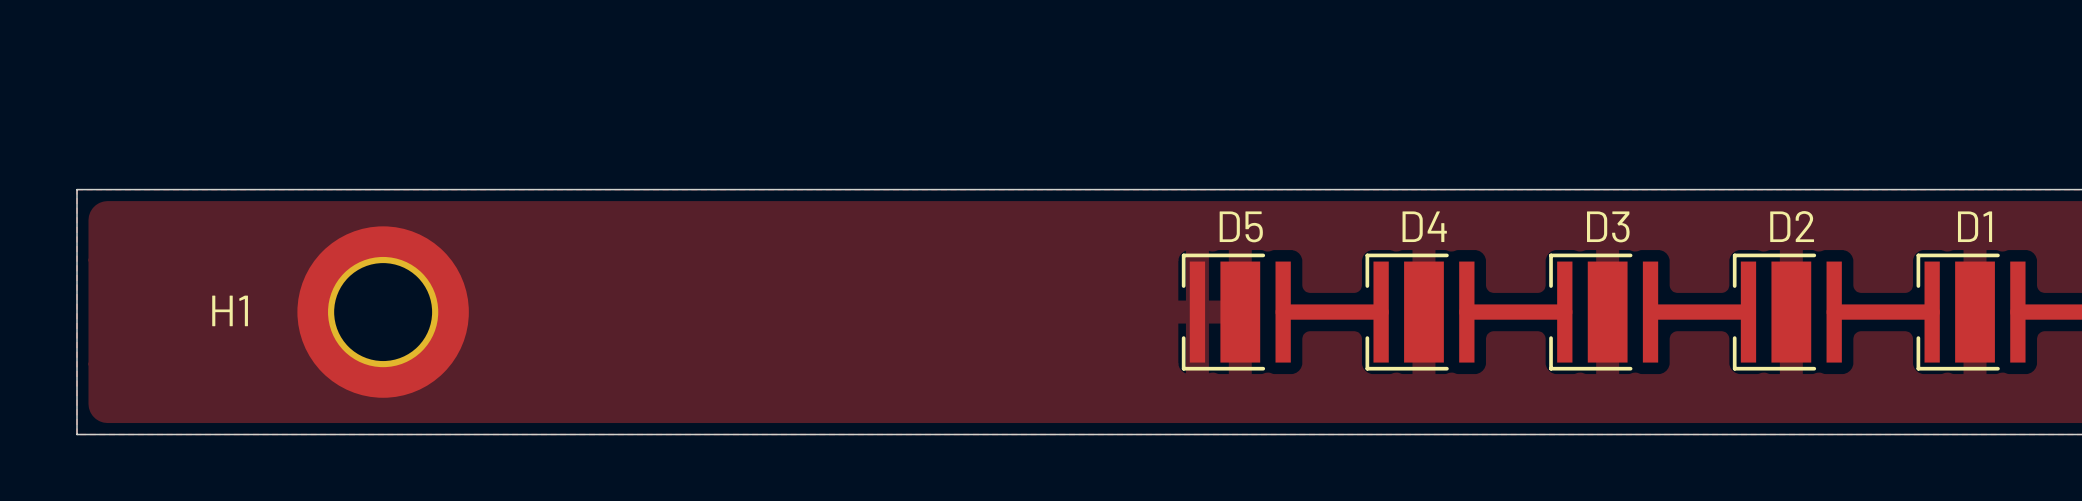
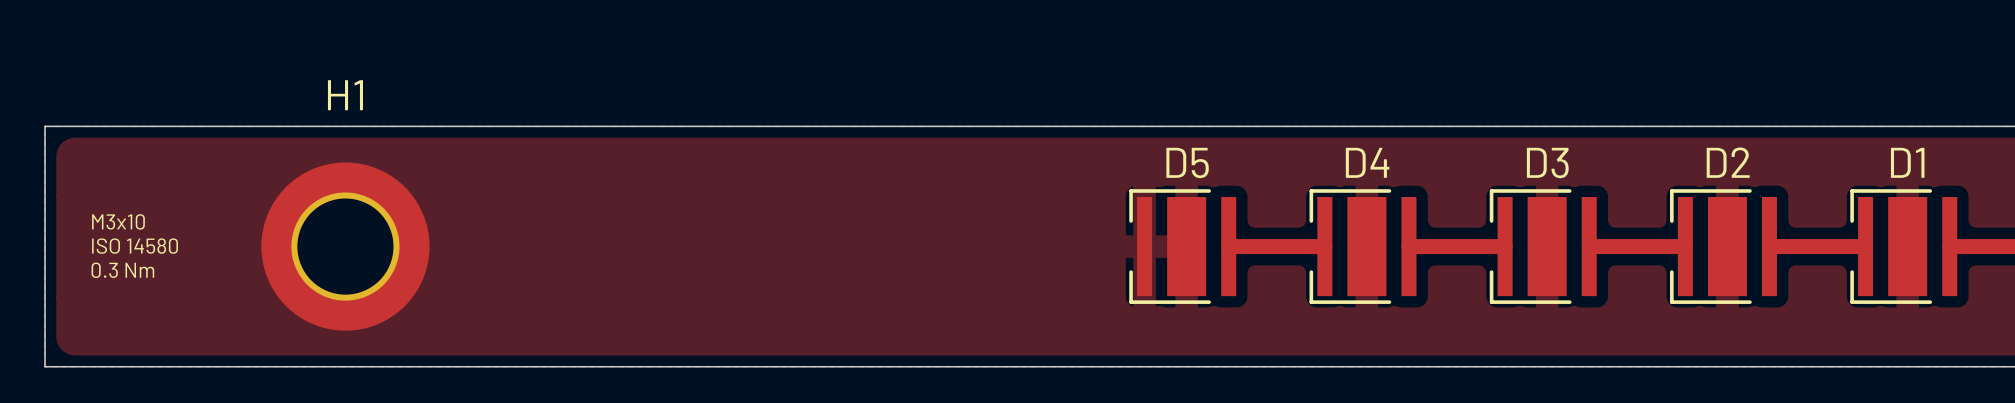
text: none -> M3x10 (118, 221)
H1 name position: H1 (230, 310) -> H1 (345, 95)
text: none -> ISO 14580 (135, 246)
text: none -> 0.3 Nm (122, 270)

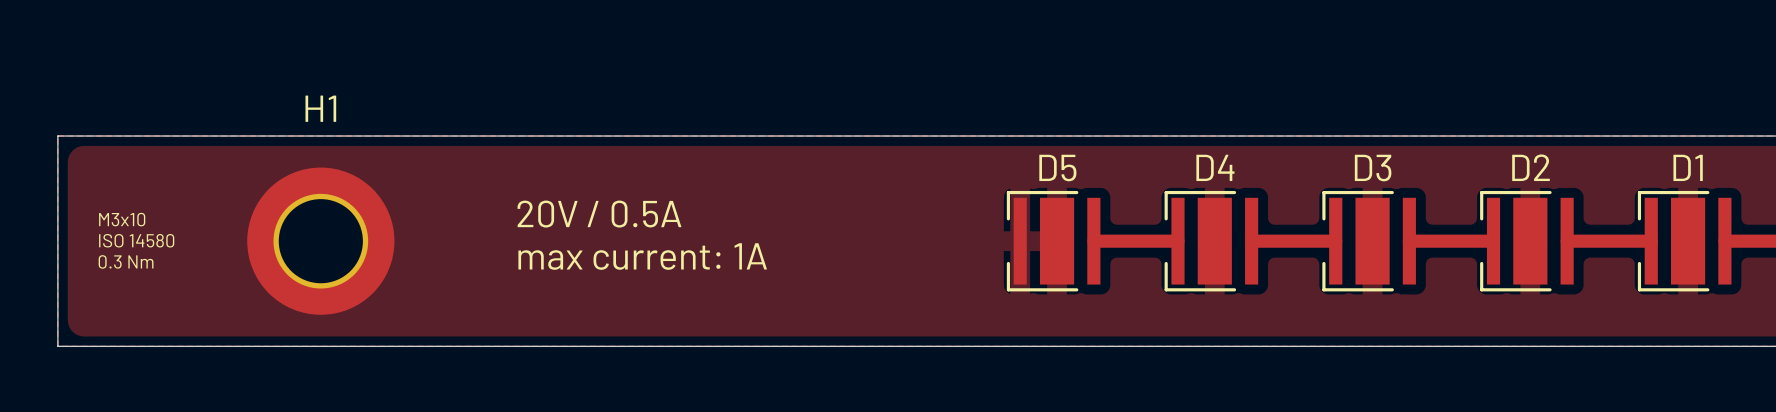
text: none -> 20V / 0.5A (599, 214)
text: none -> max current: 1A (642, 256)

